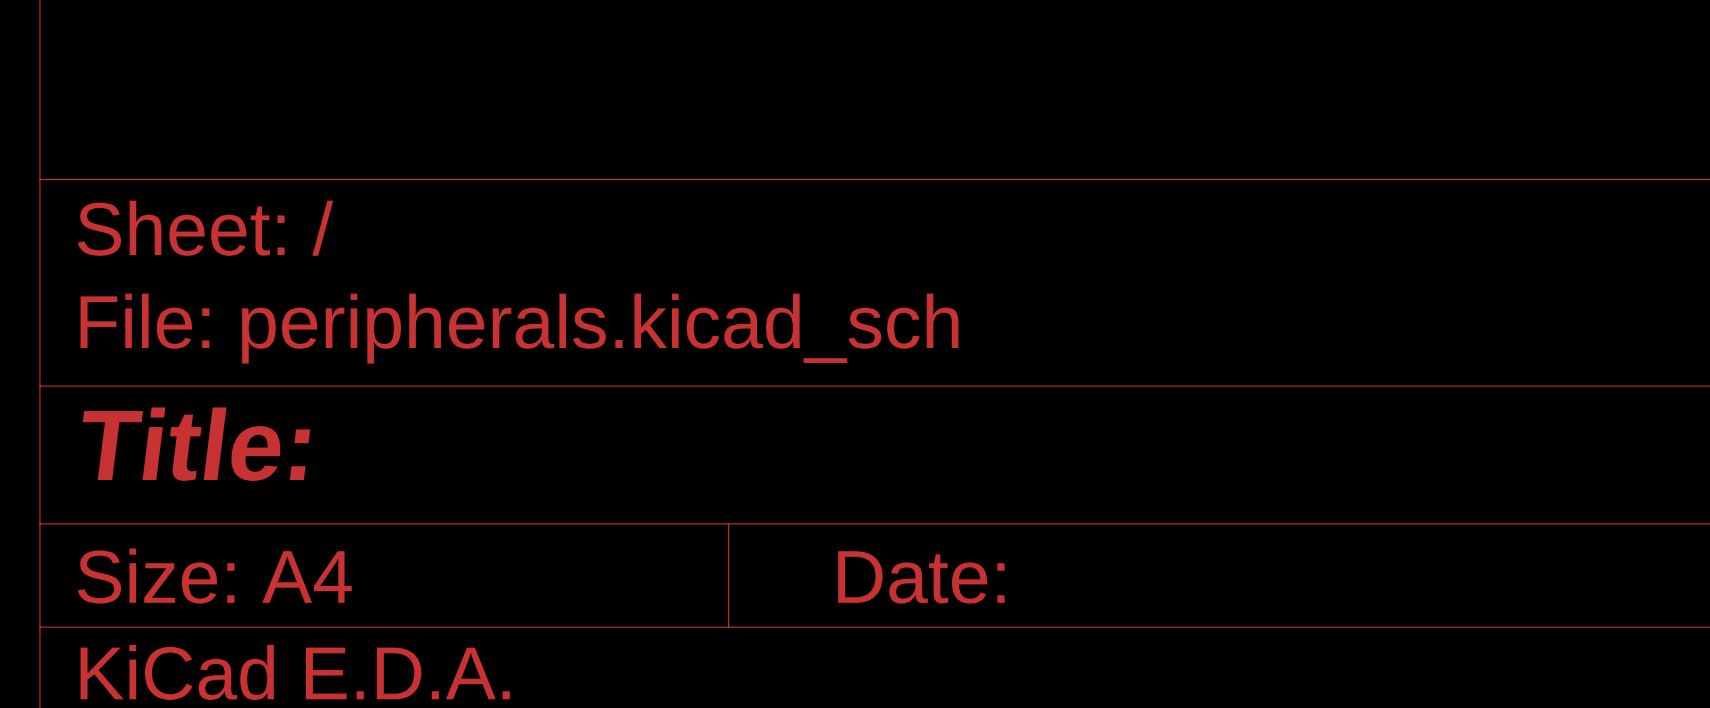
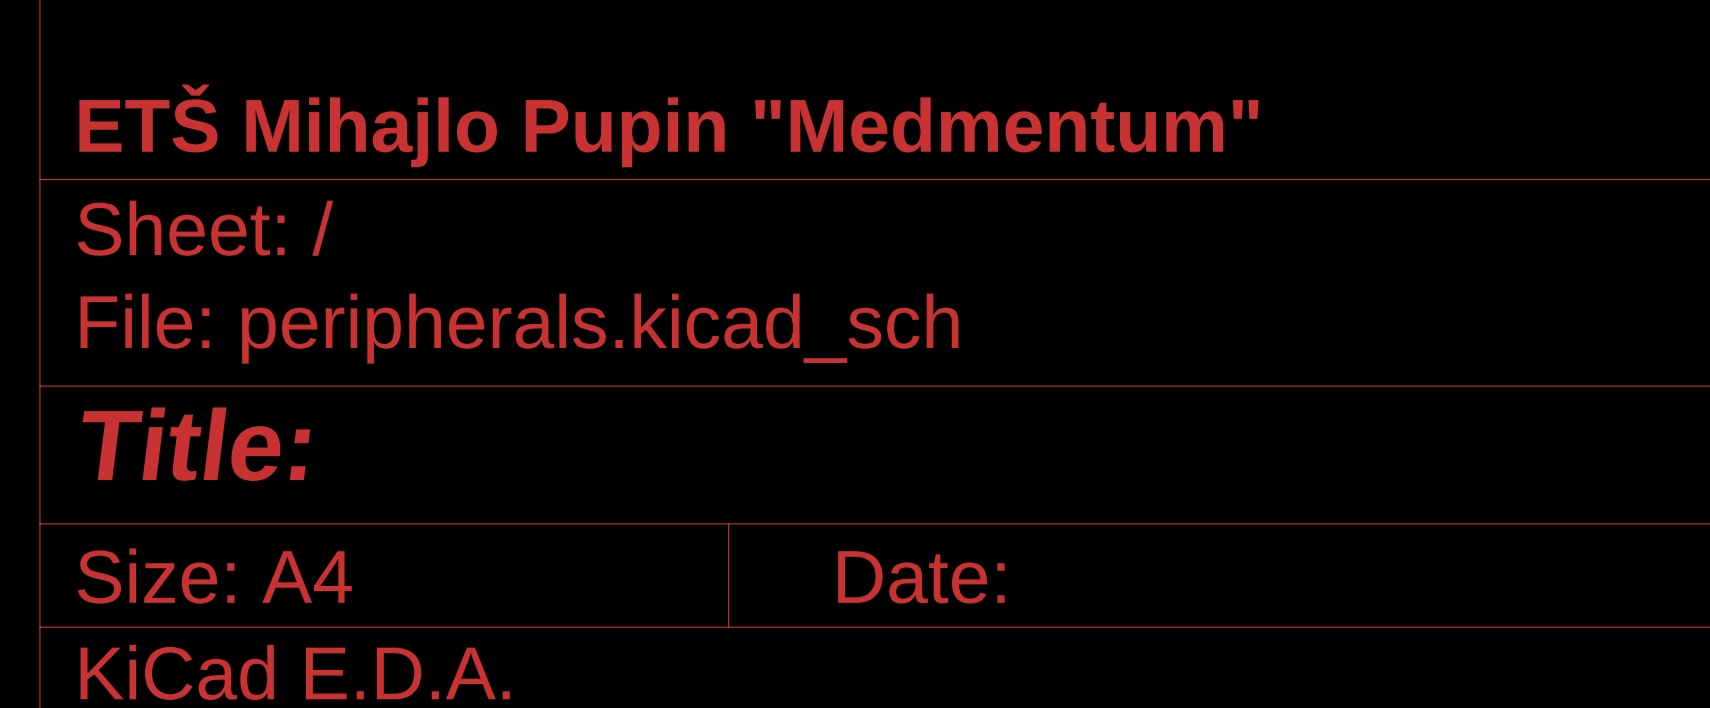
title block: none -> ETŠ Mihajlo Pupin "Medmentum" (668, 125)

